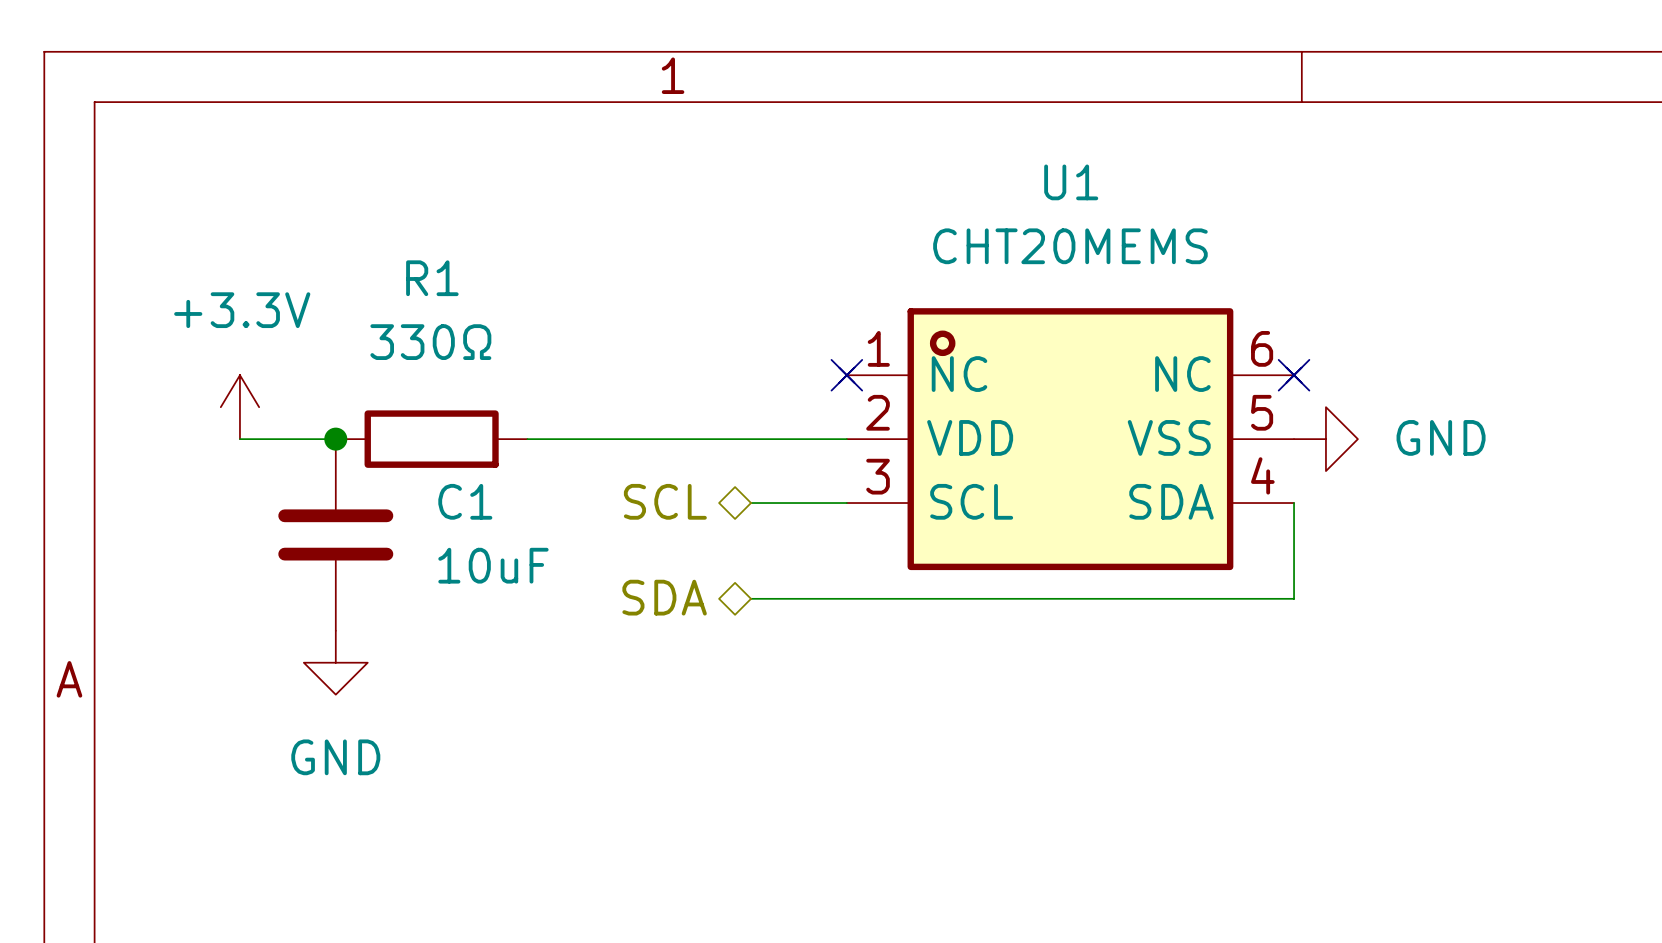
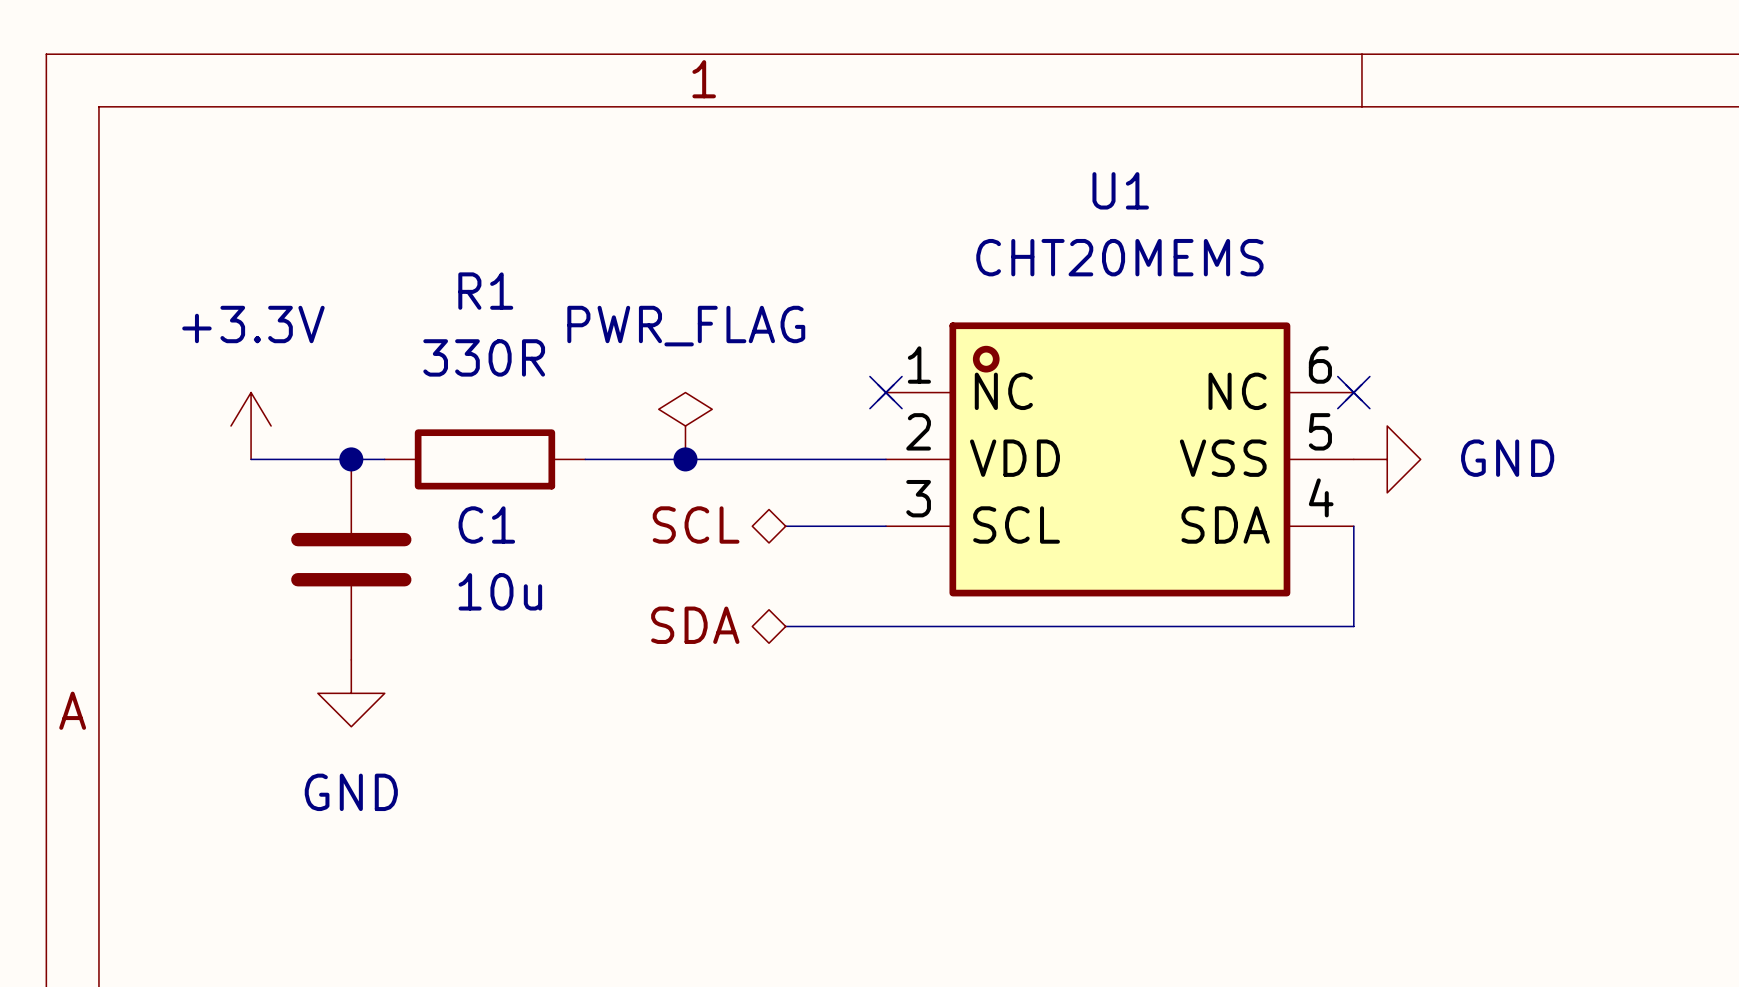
R1 value: 330Ω (430, 342) -> 330R (484, 357)
power symbol: none -> PWR_FLAG (685, 426)
R1 position: (431, 439) -> (484, 459)
junction: none -> (685, 459)
C1 value: 10uF (493, 565) -> 10u (500, 591)

